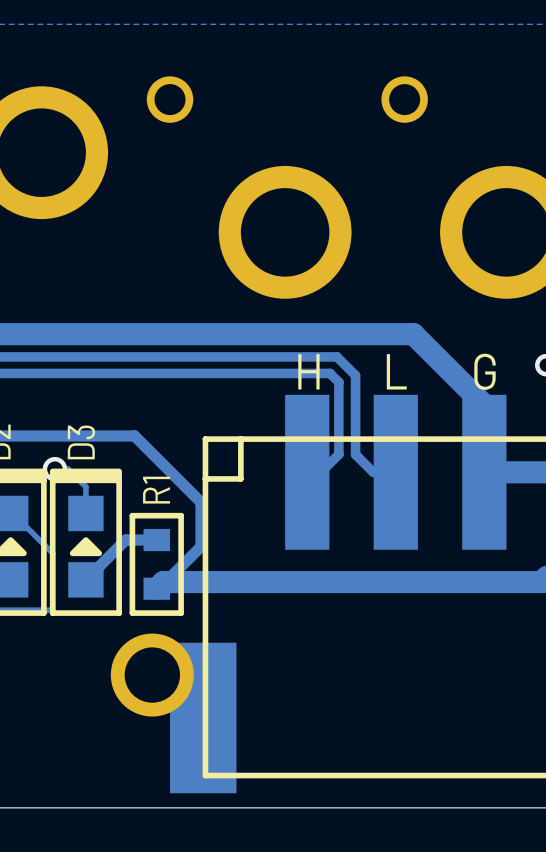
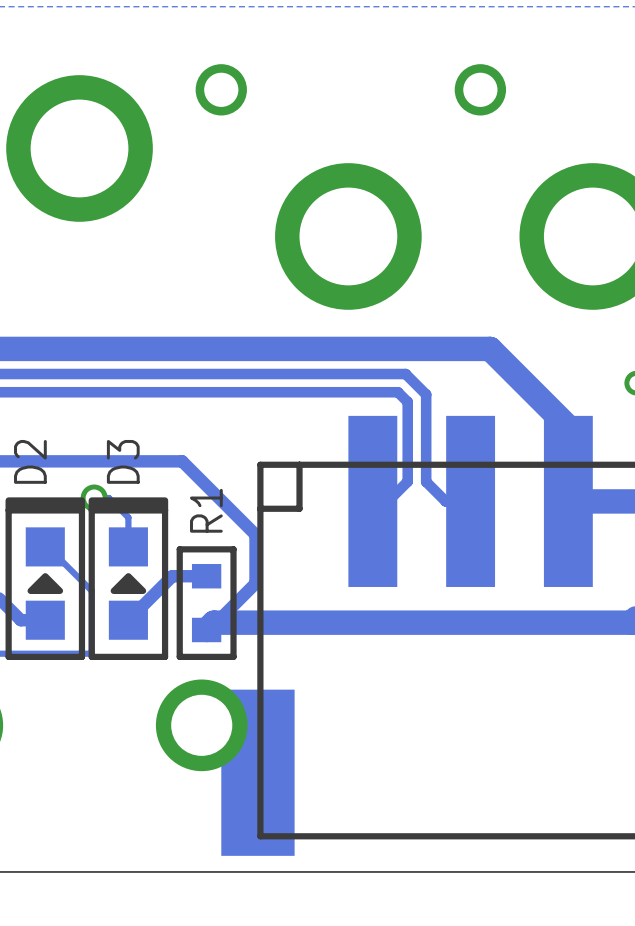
text: H (308, 371) -> none
text: L (396, 371) -> none
text: G (485, 371) -> none

